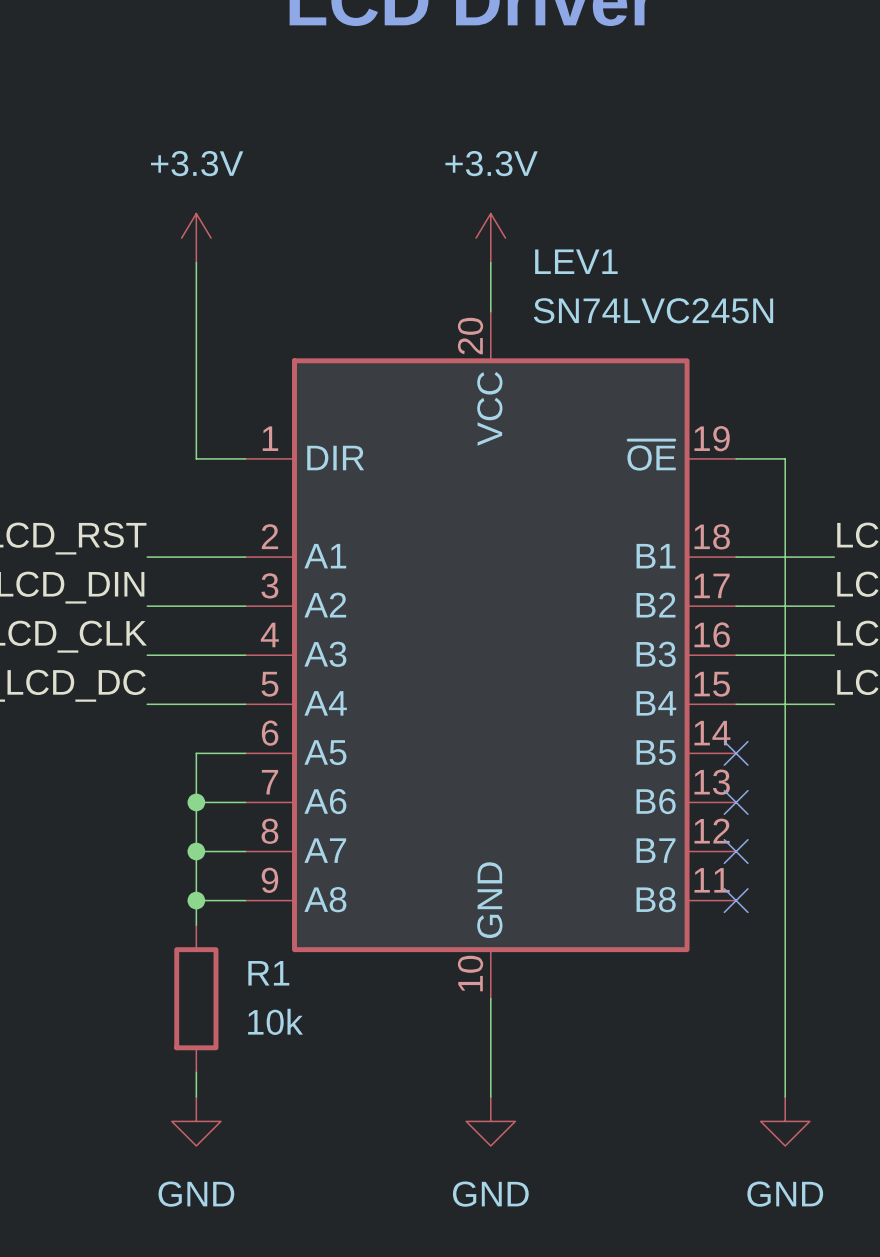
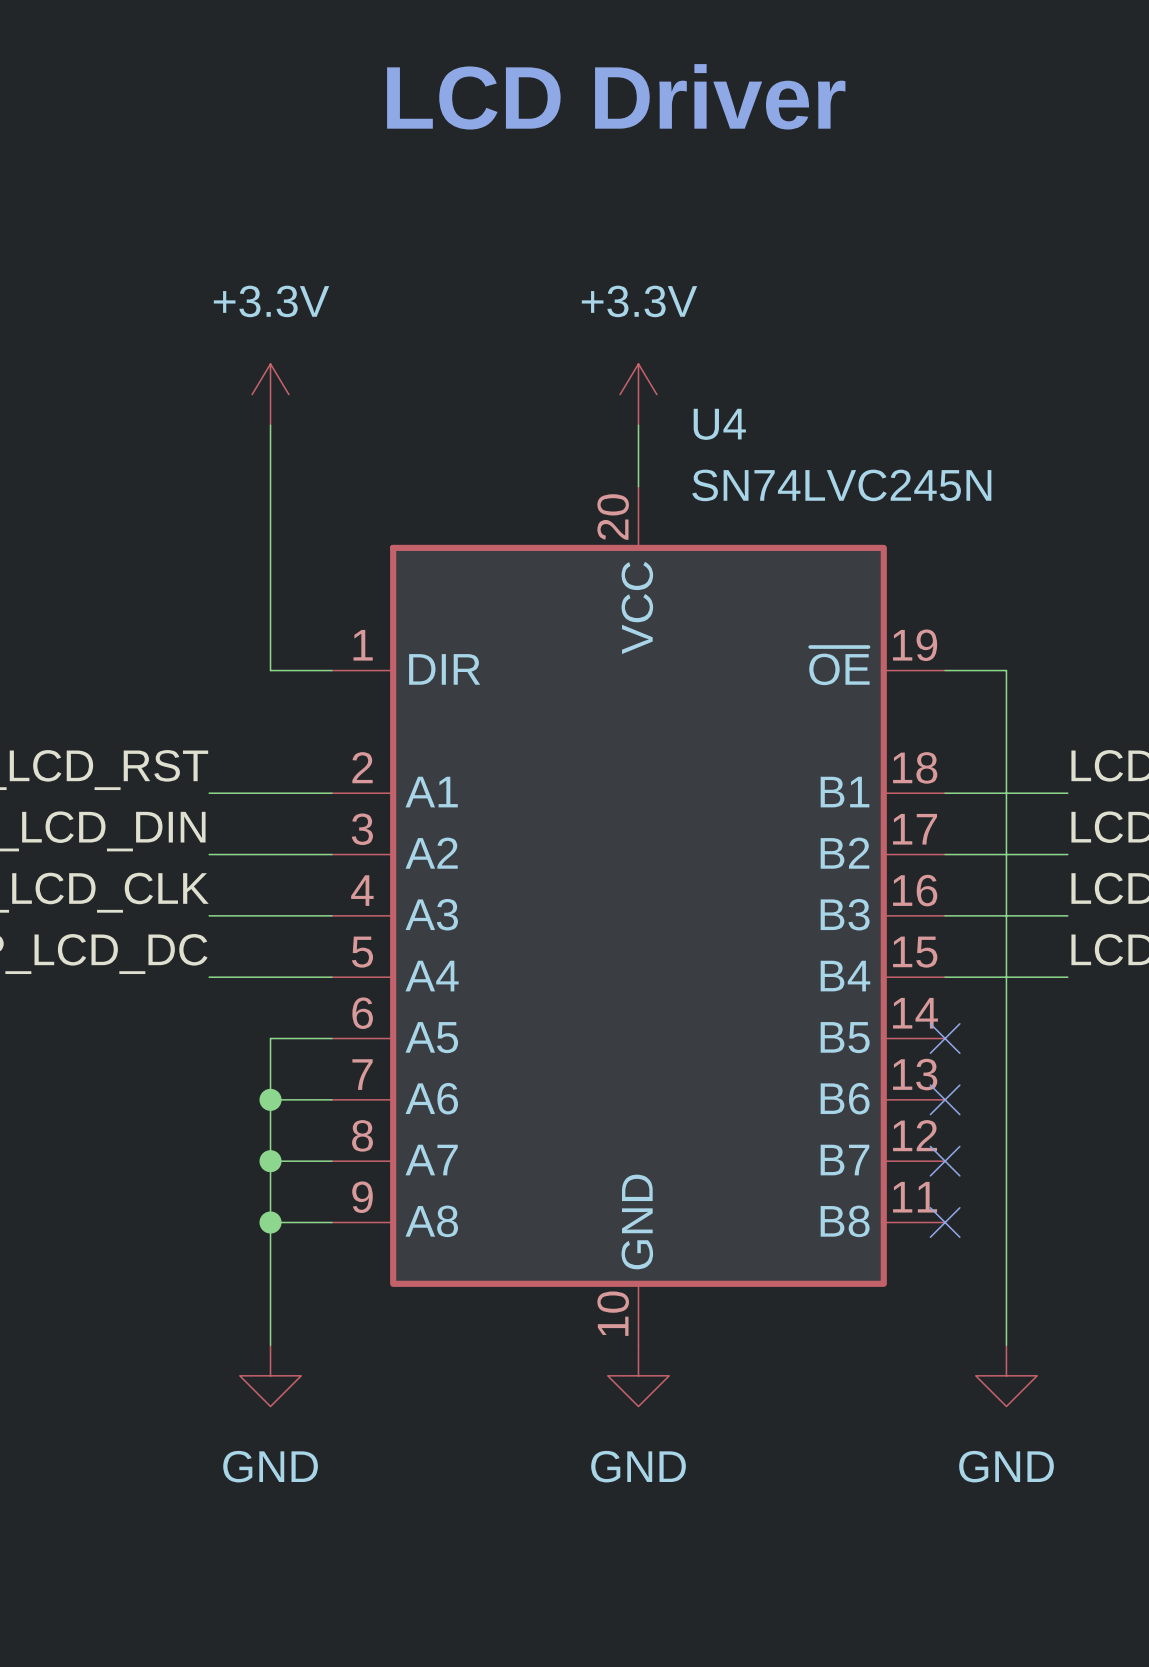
LEV1 name: LEV1 (576, 261) -> U4 (719, 424)
wire: none -> (270, 1253) (270, 1345)
R1: 10k (196, 998) -> none
wire: (490, 998) (490, 1096) -> none
wire: (785, 998) (785, 1096) -> none
wire: (196, 1072) (196, 1096) -> none
power symbol position: GND (196, 1121) -> GND (270, 1375)
power symbol position: GND (490, 1121) -> GND (638, 1375)
power symbol position: GND (785, 1121) -> GND (1006, 1375)

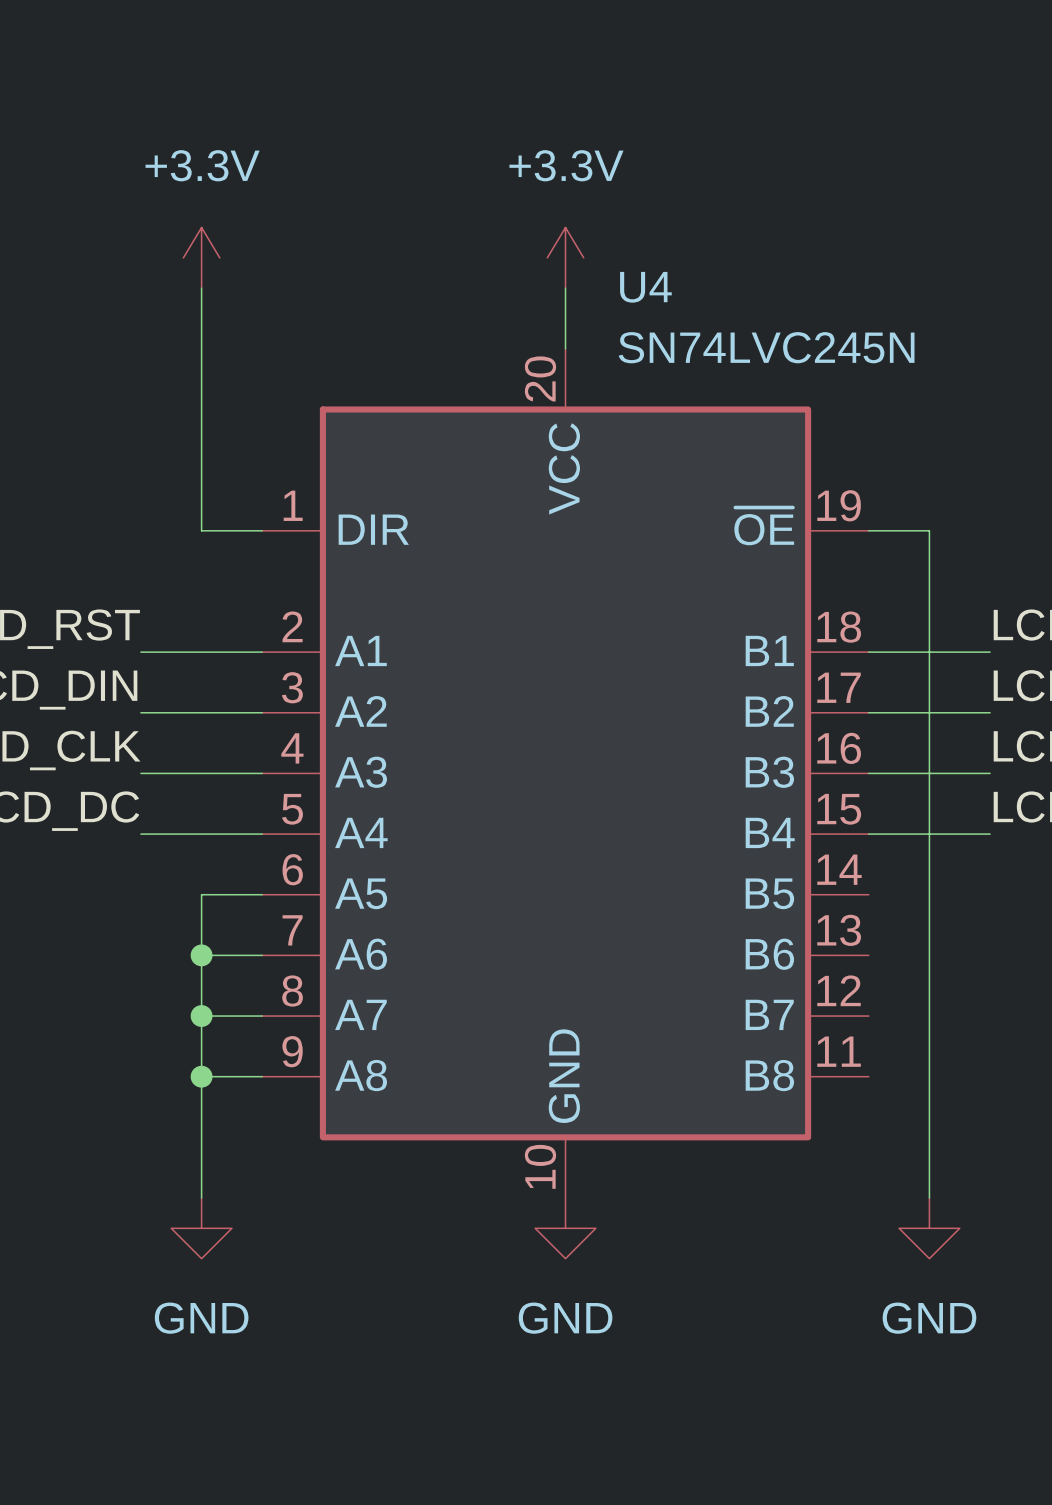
no-connect mark: (945, 1038) -> none
no-connect mark: (945, 1099) -> none
no-connect mark: (945, 1161) -> none
no-connect mark: (945, 1222) -> none

